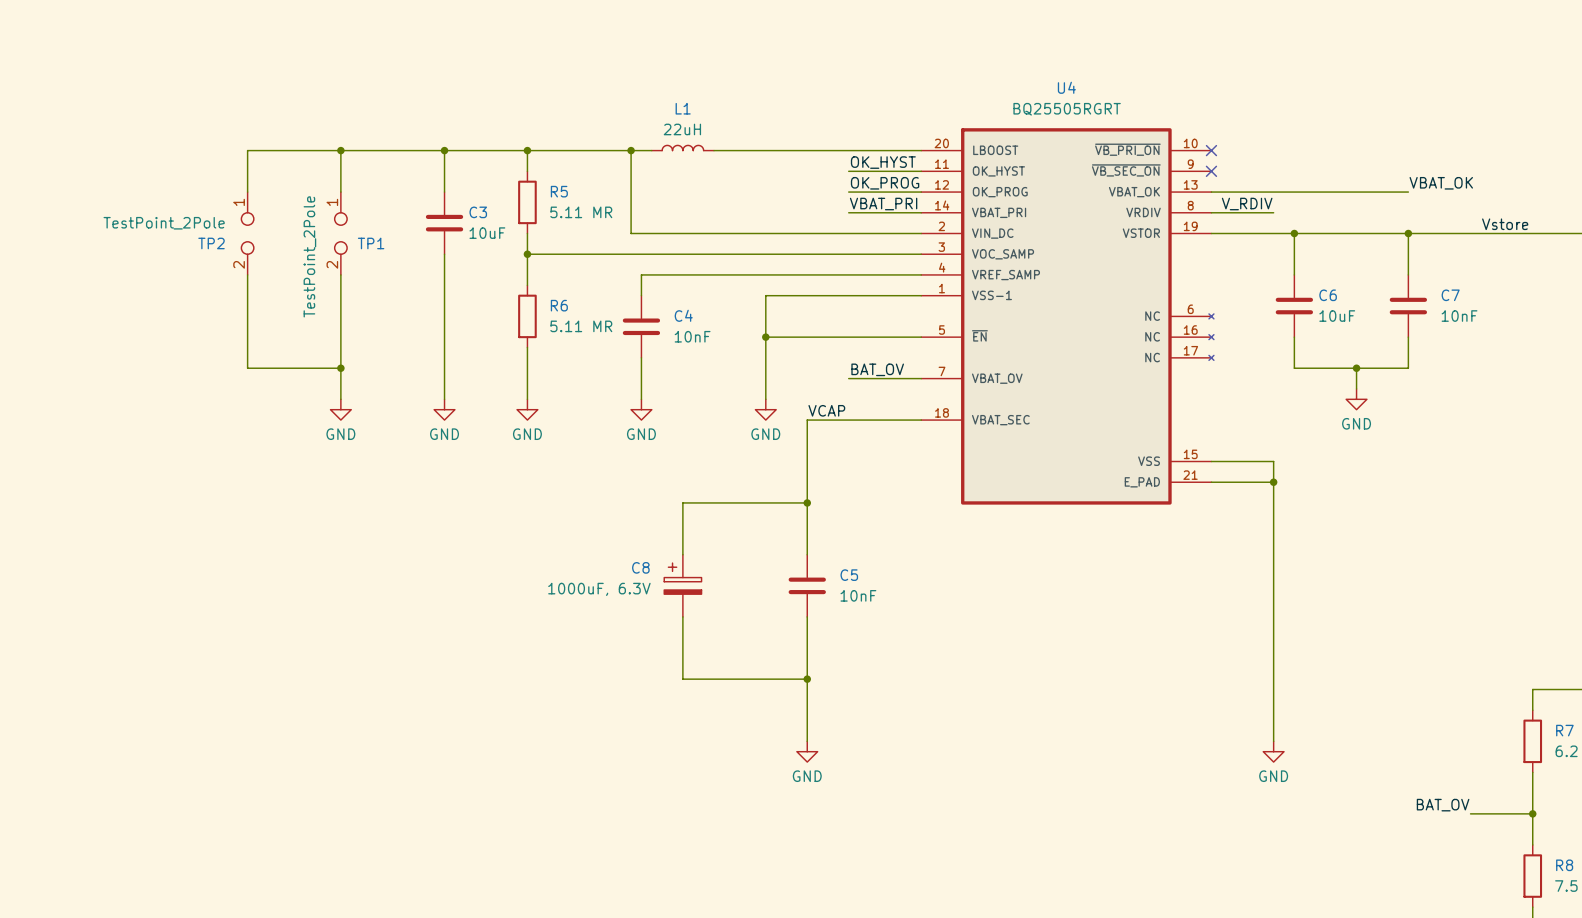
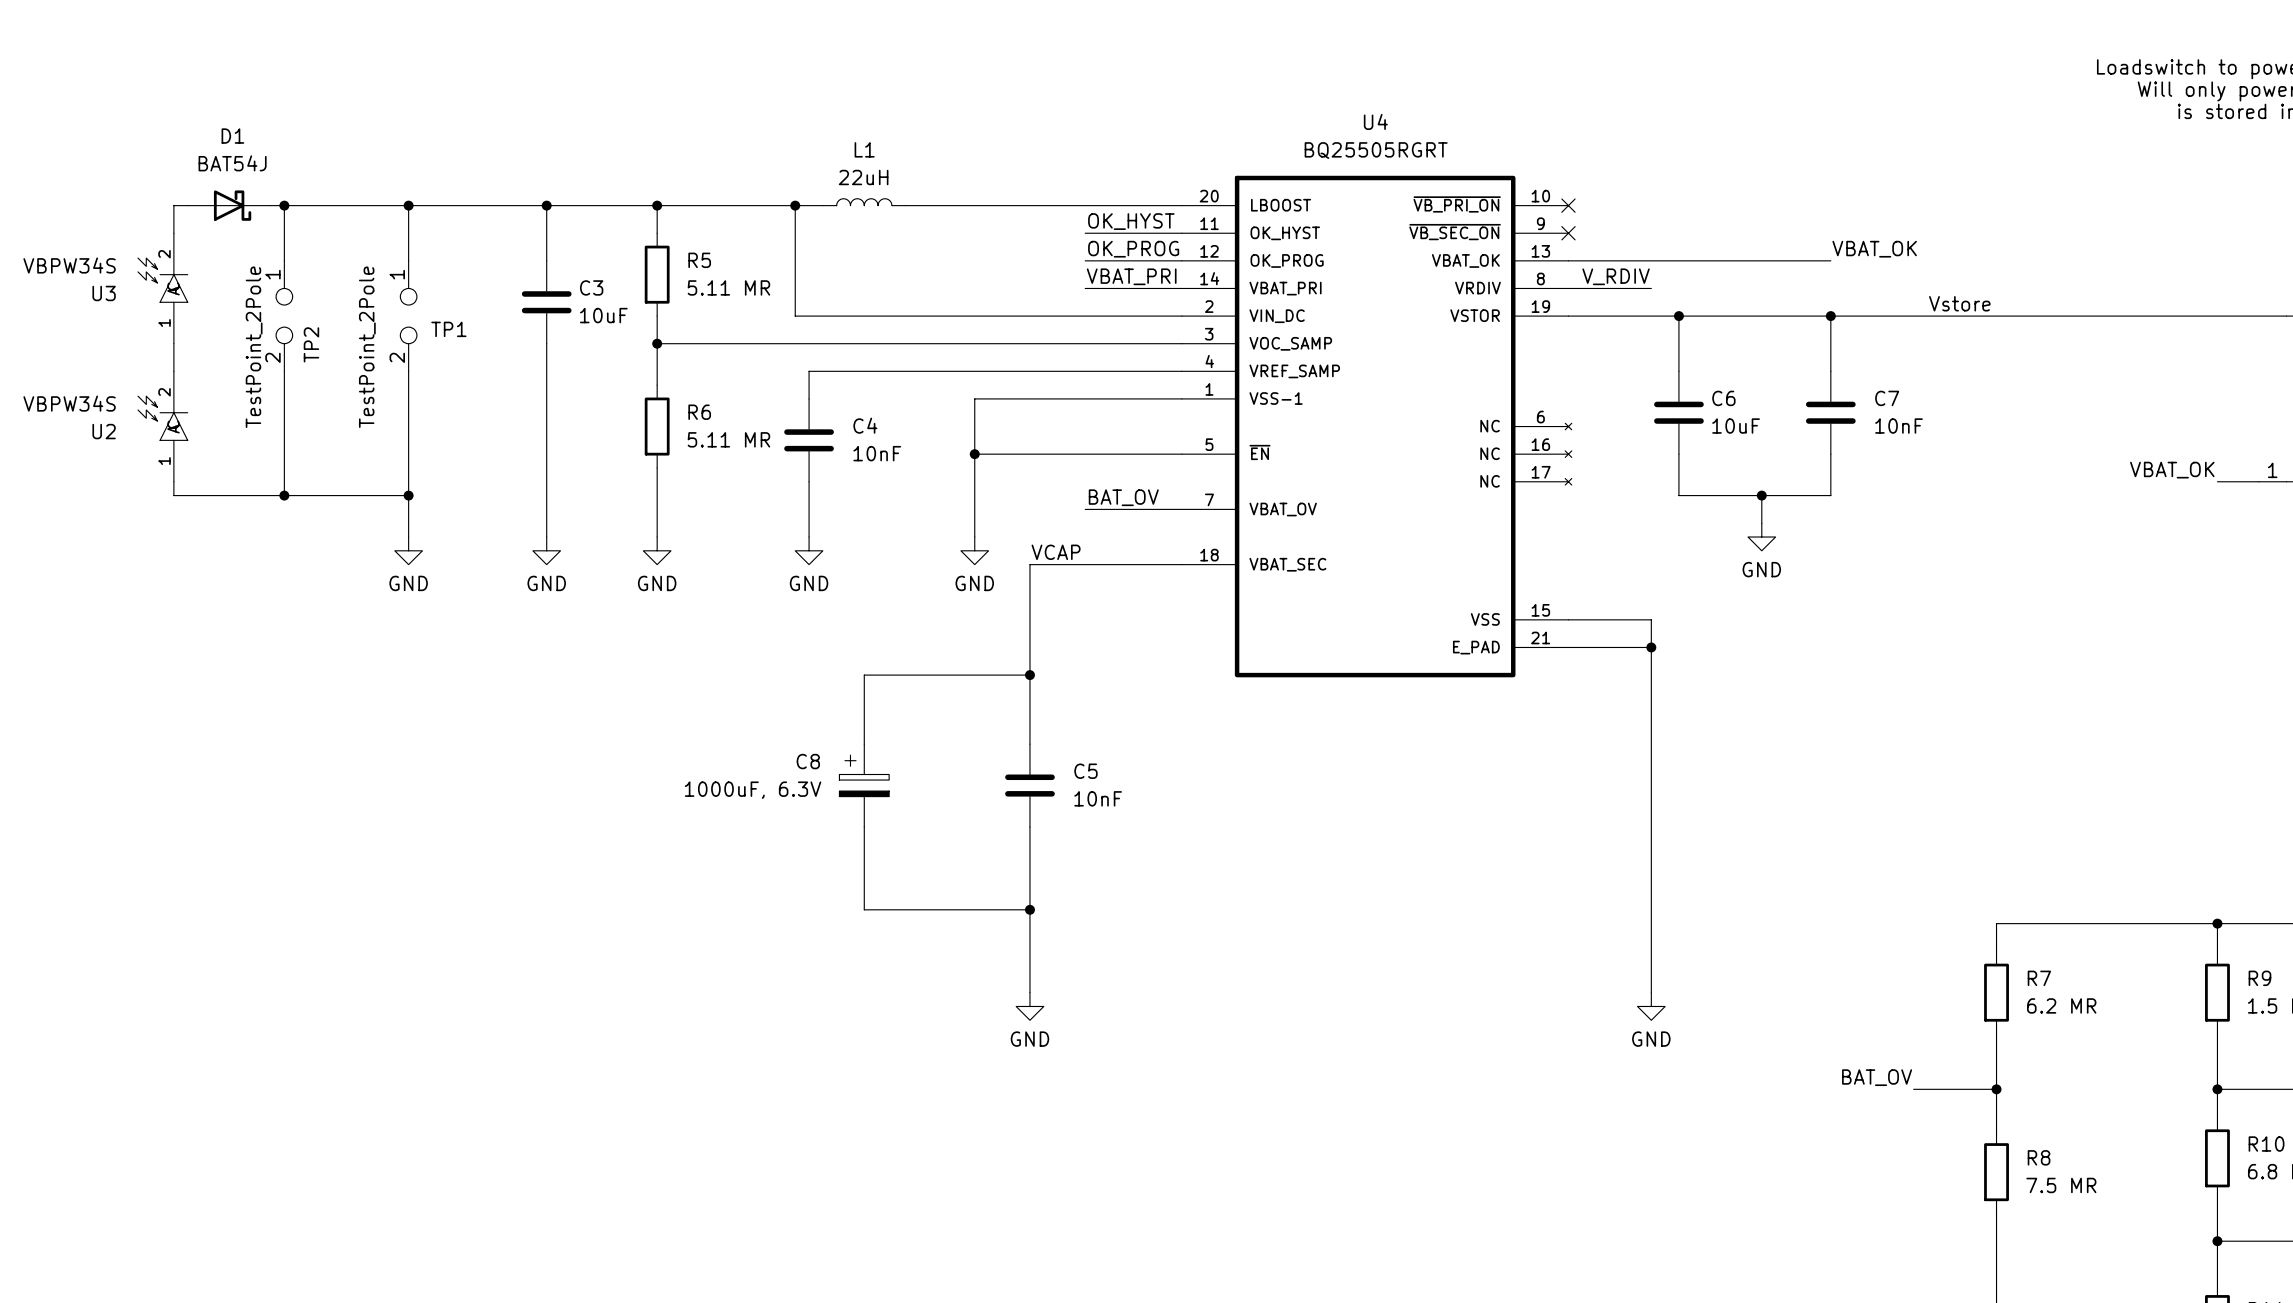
wire: none -> (187, 205) (173, 205) (173, 233)
D1: none -> BAT54J (229, 205)
wire: none -> (270, 205) (284, 205)
junction: none -> (284, 205)
U3: none -> VBPW34S (162, 288)
TP2 value rotation: 0° (164, 223) -> 90° counterclockwise (254, 347)
TP2 name rotation: 0° (211, 243) -> 90° counterclockwise (311, 344)
TP2 name position: TP2 (211, 243) -> TP2 (311, 344)
wire: none -> (173, 343) (173, 371)
U2: none -> VBPW34S (162, 426)
wire: none -> (173, 481) (173, 495) (284, 495)
junction: none -> (284, 495)

